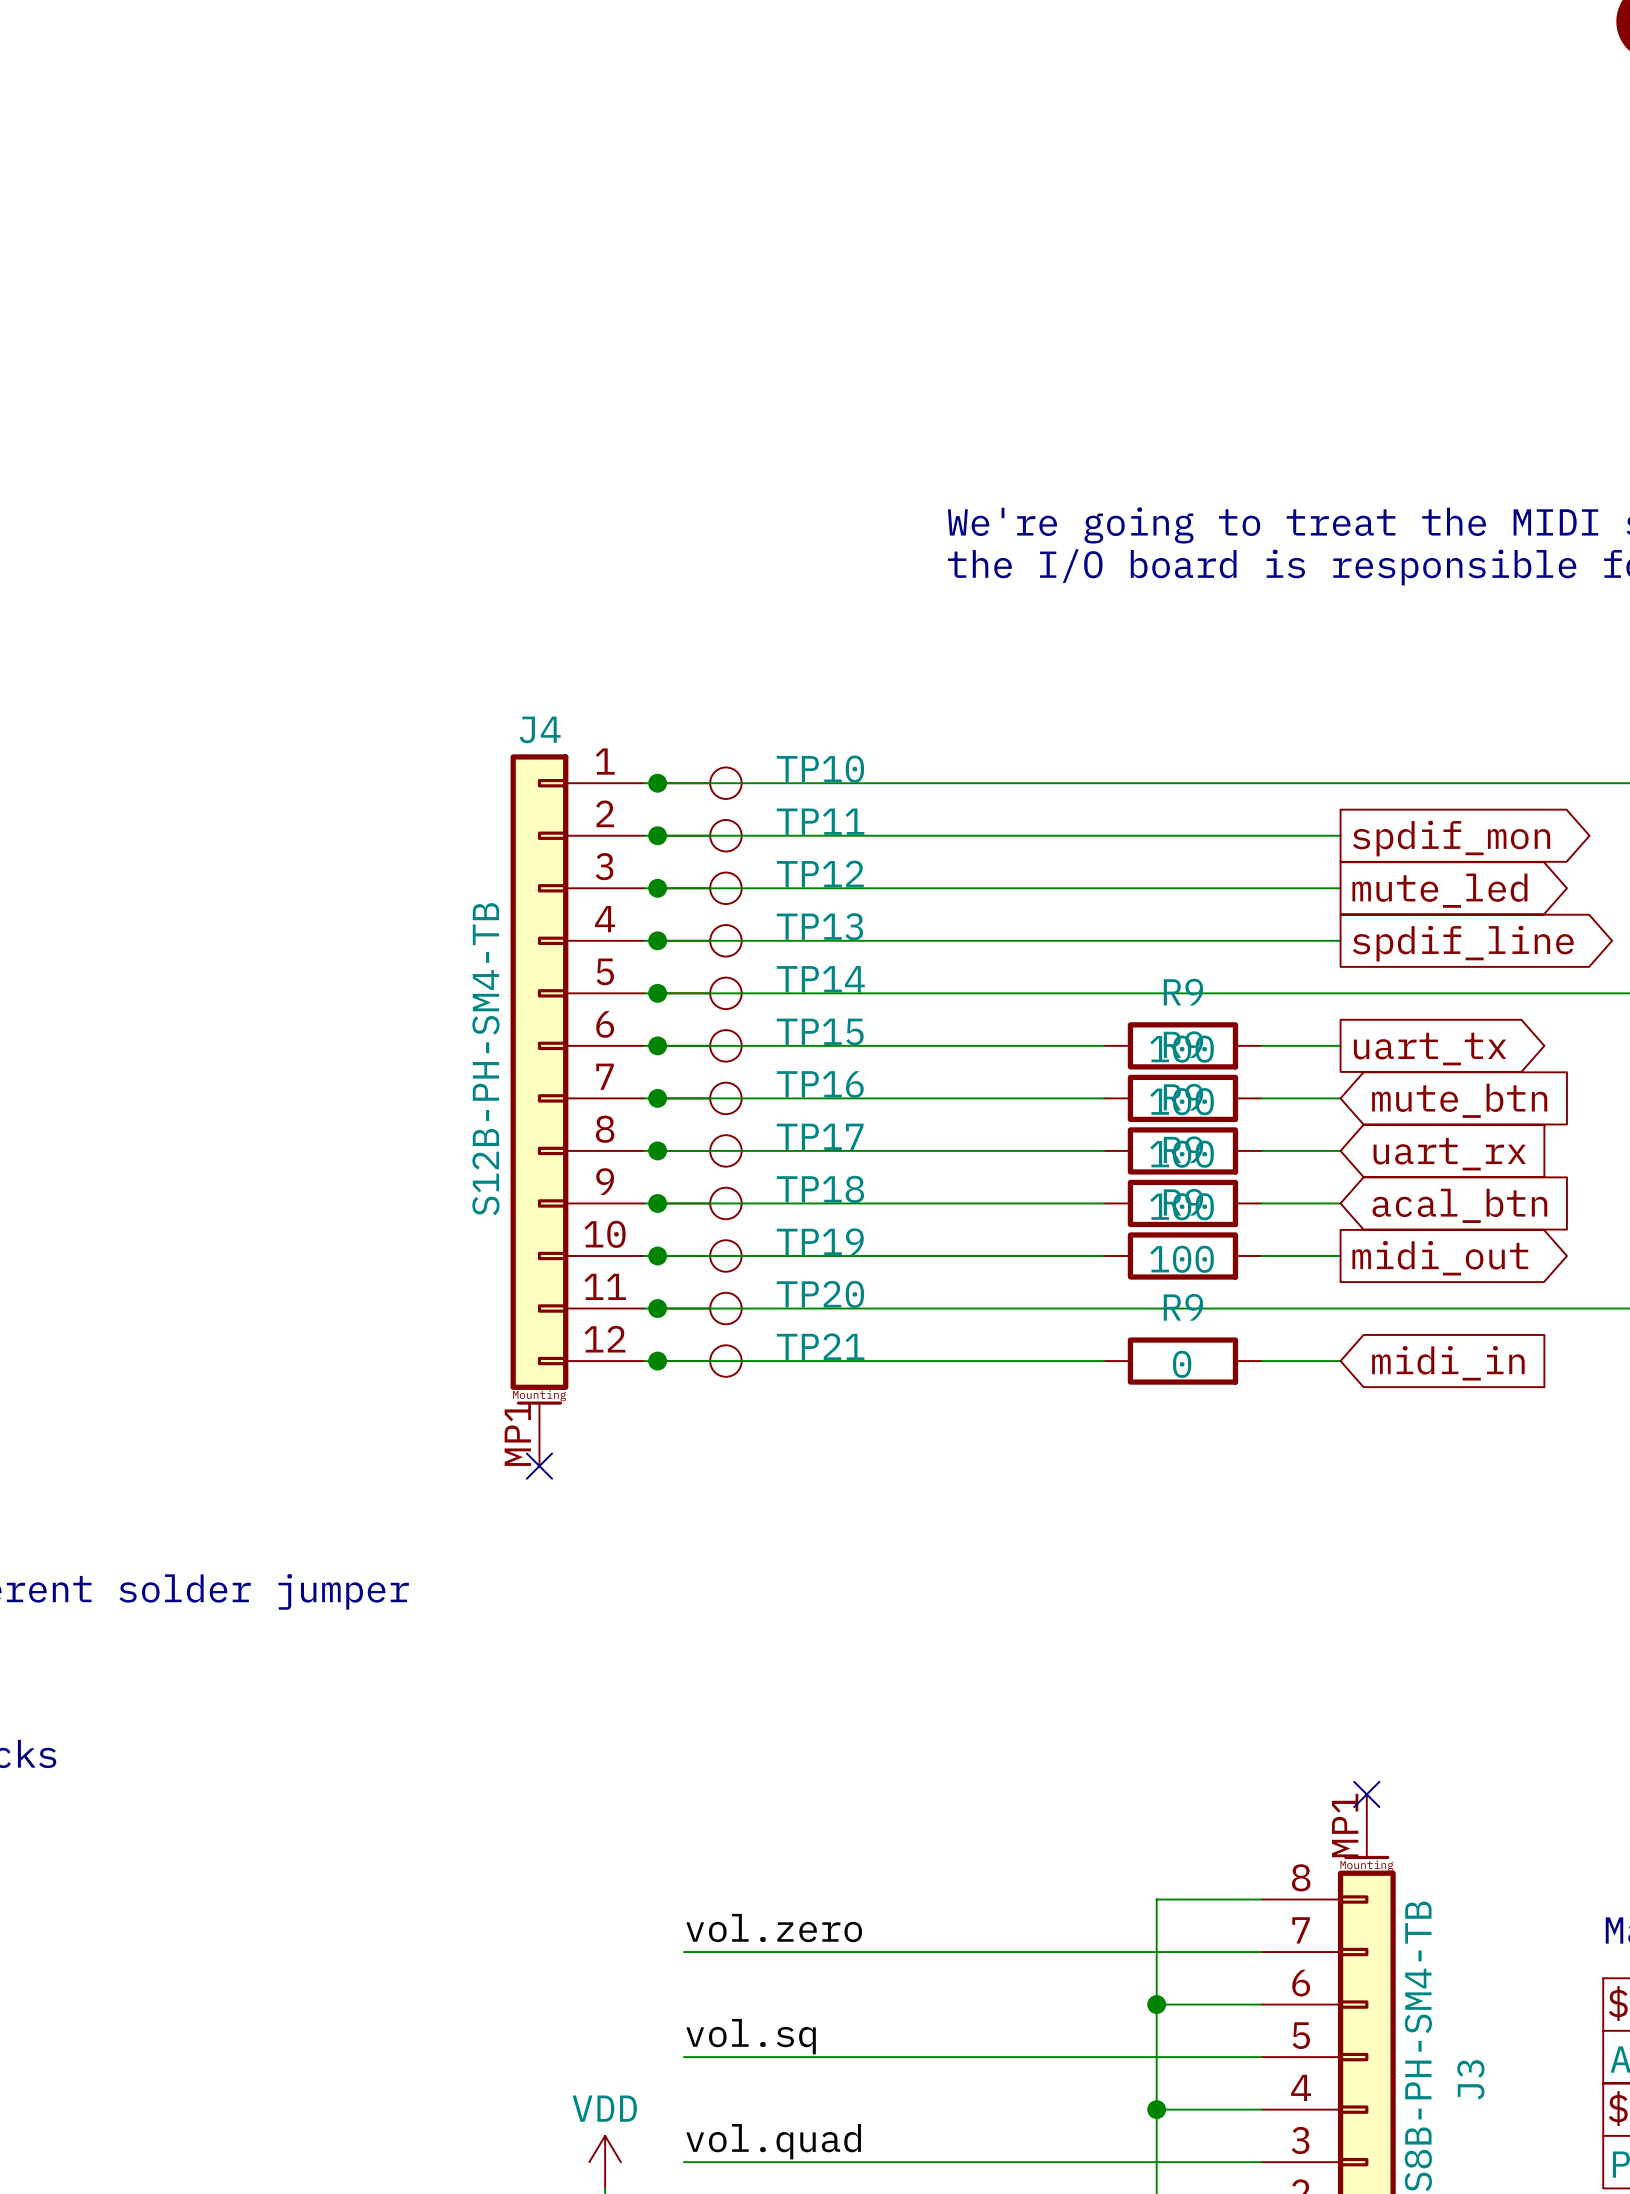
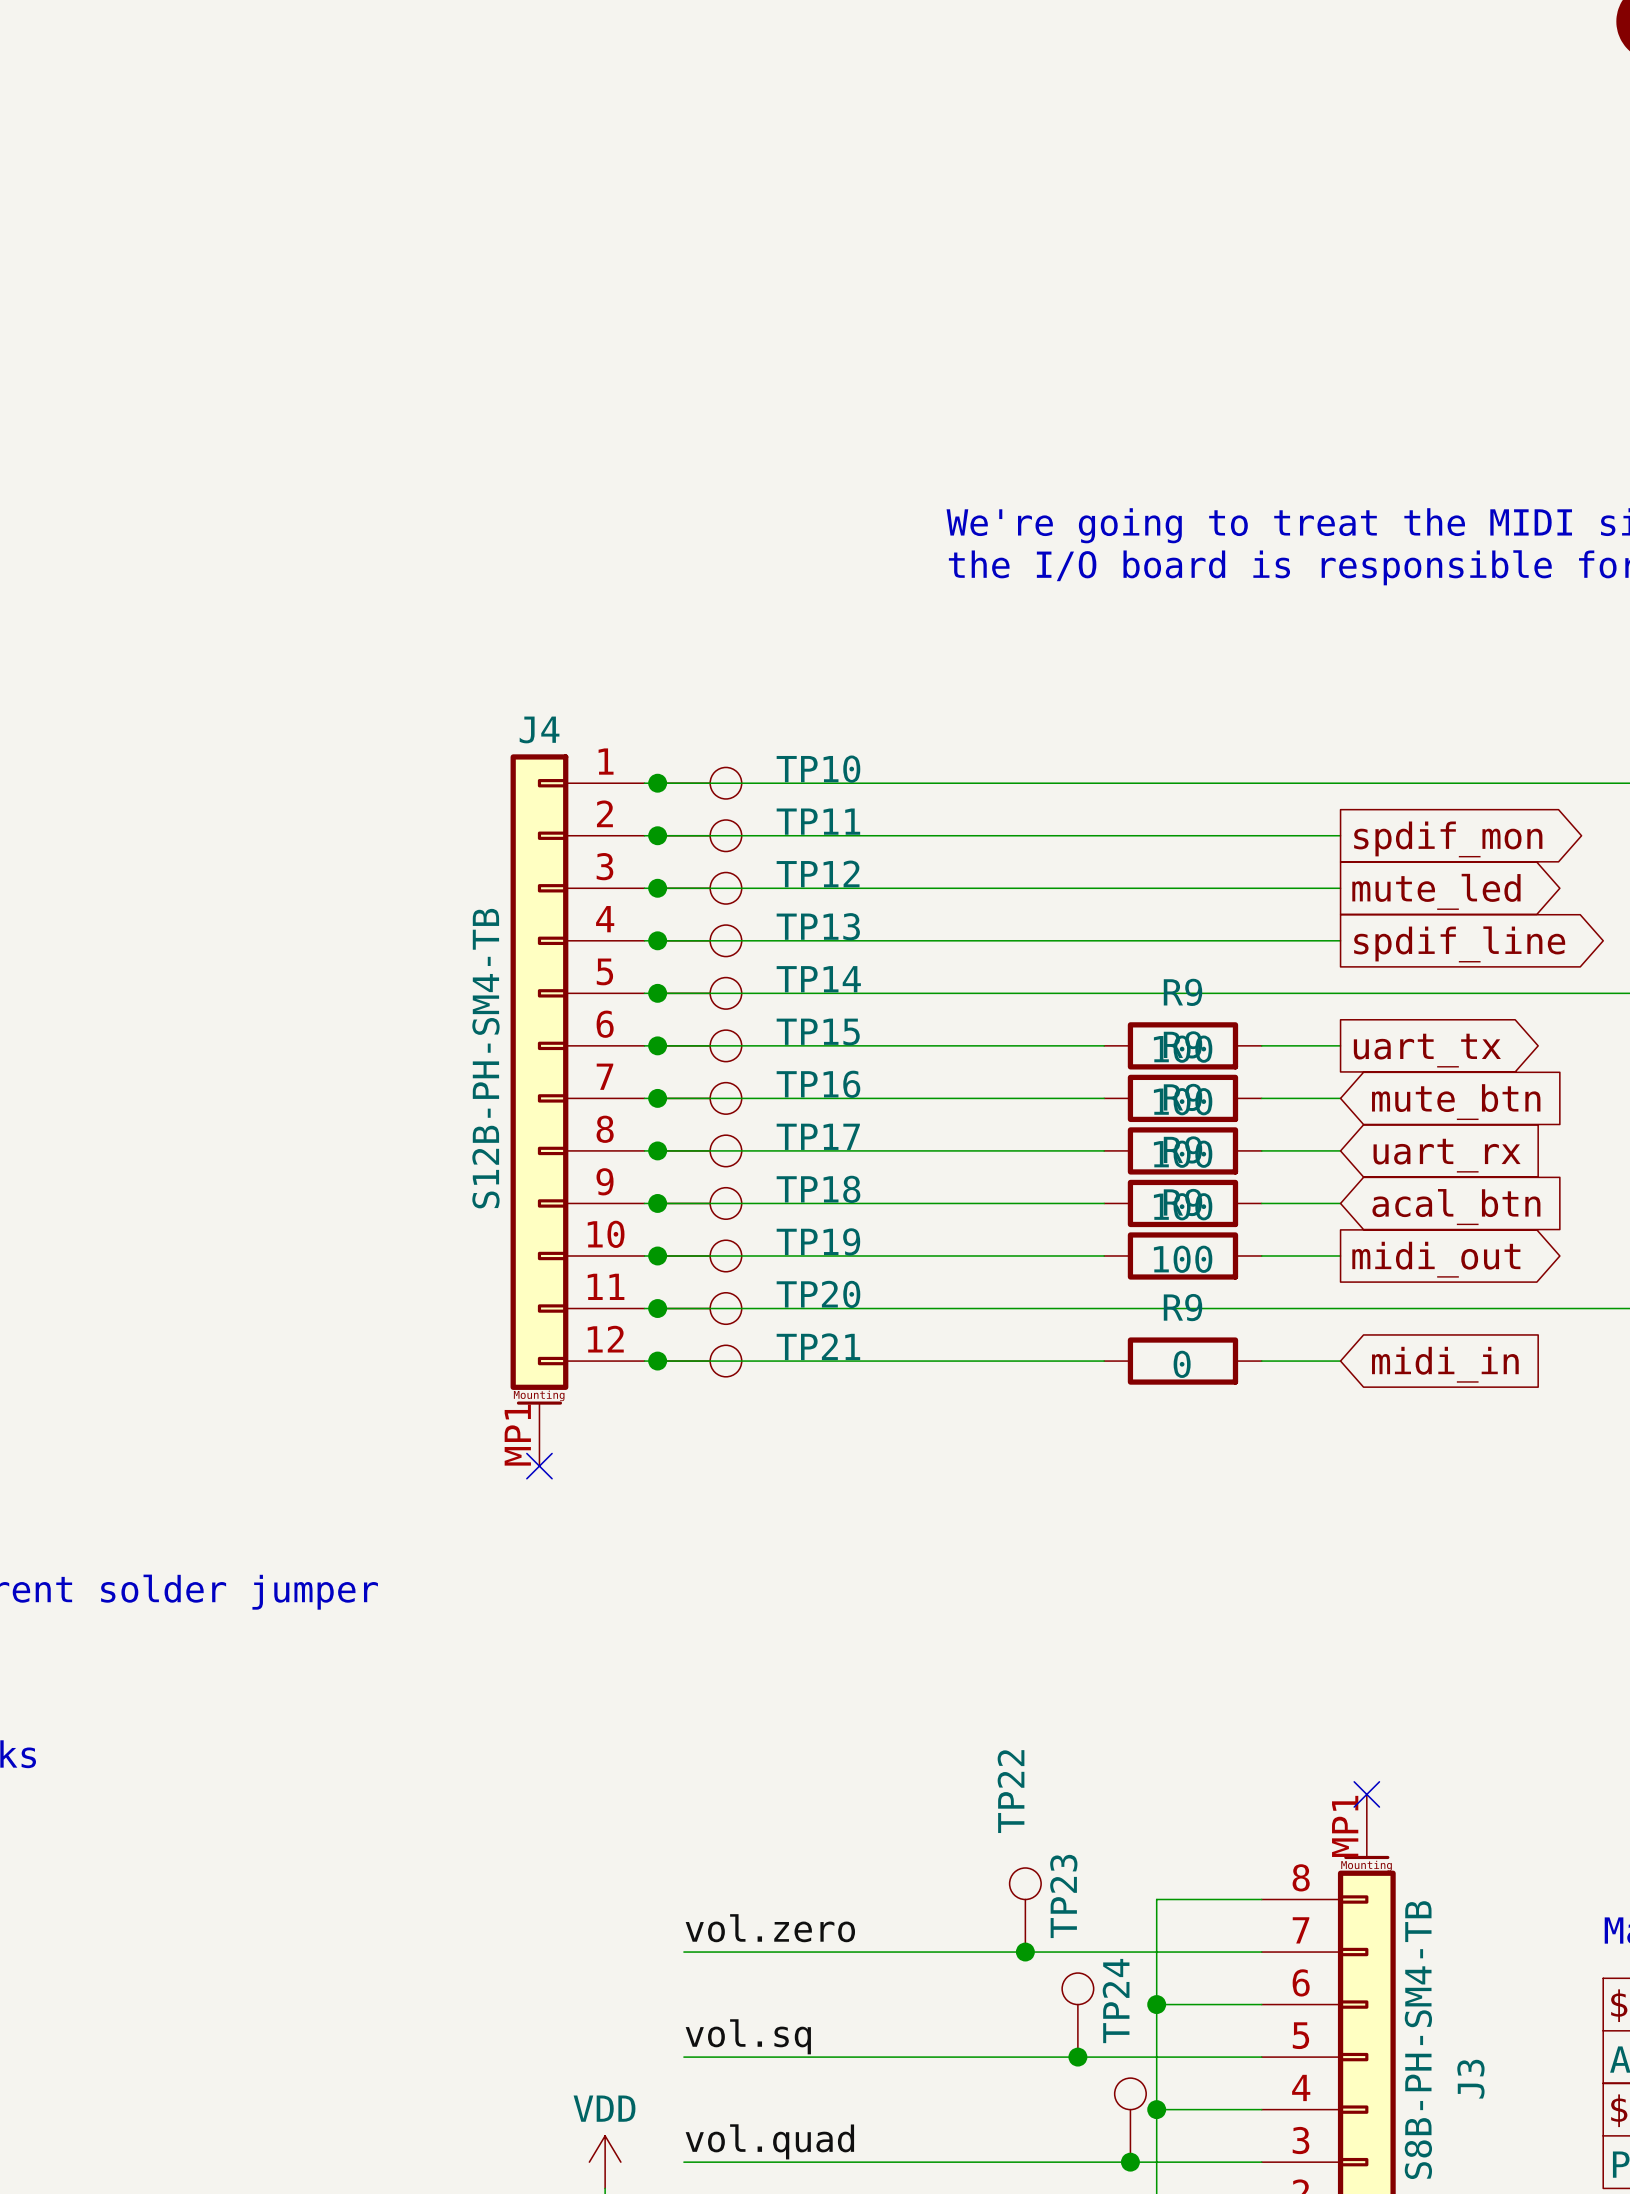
TP22: none -> (1025, 1910)
junction: none -> (1025, 1952)
TP23: none -> (1077, 2015)
junction: none -> (1077, 2057)
TP24: none -> (1130, 2120)
junction: none -> (1130, 2162)

